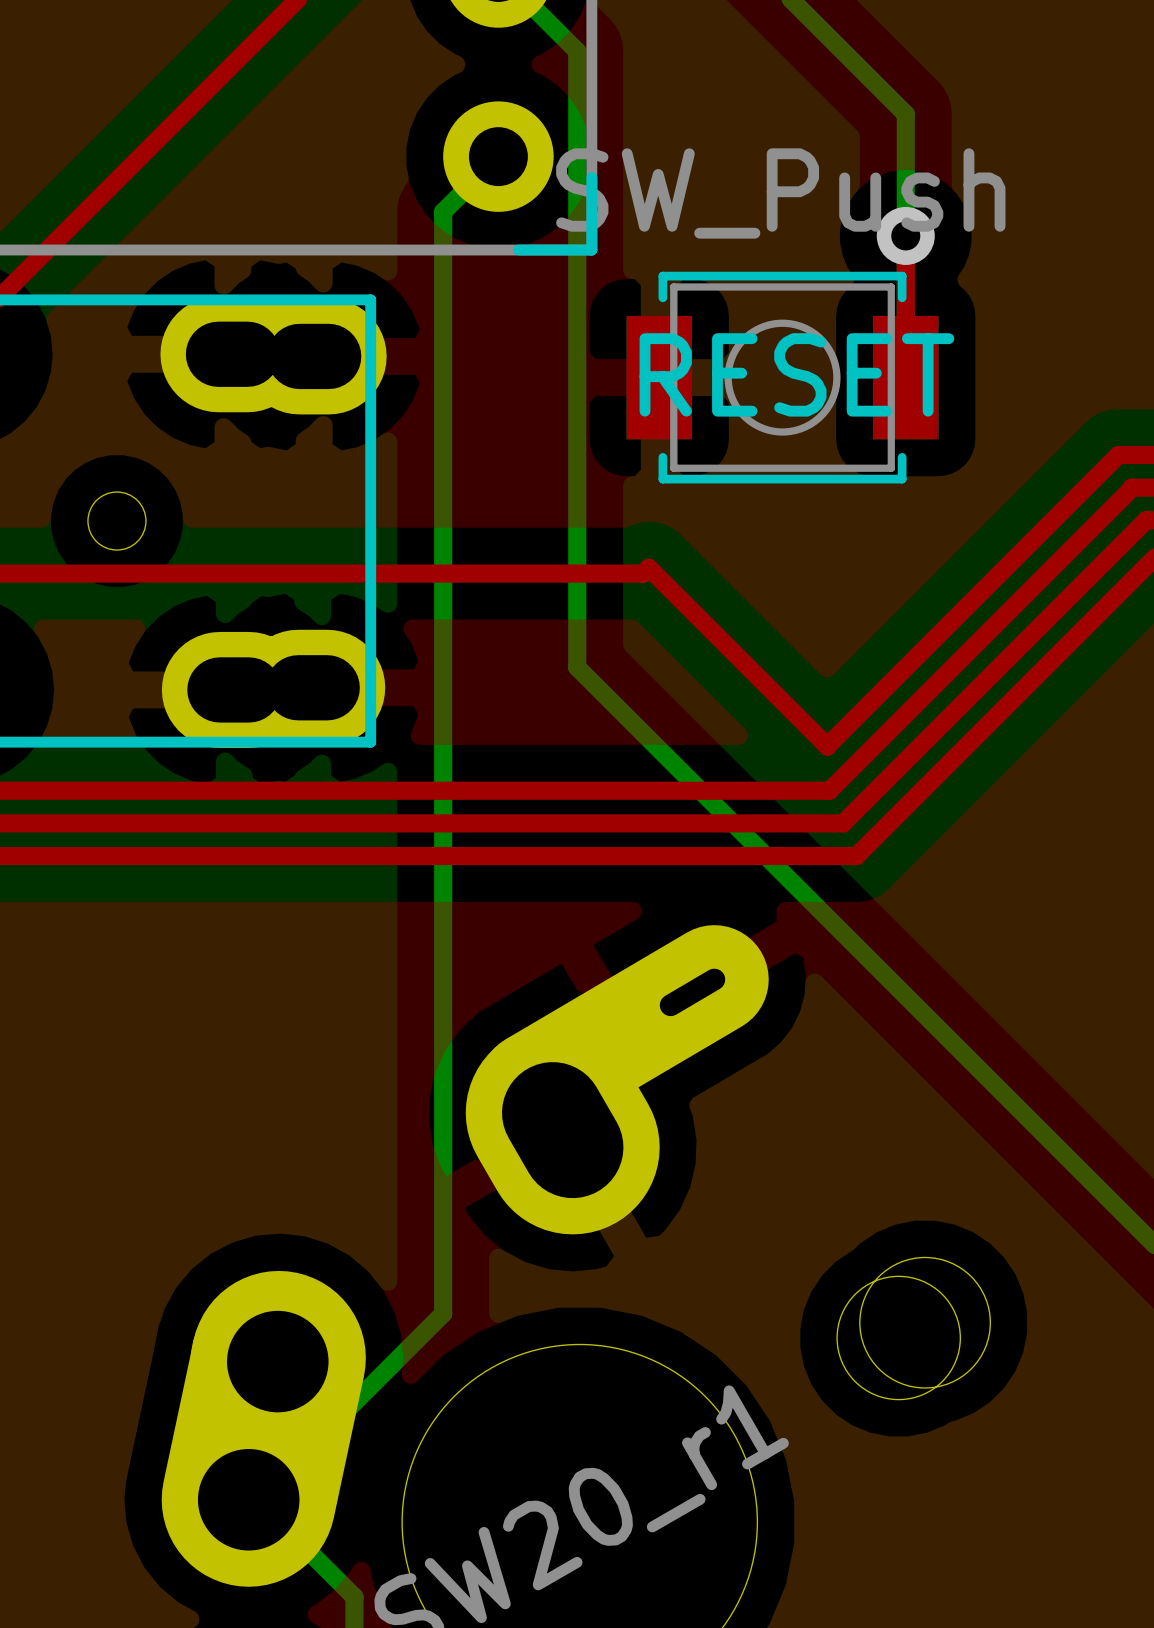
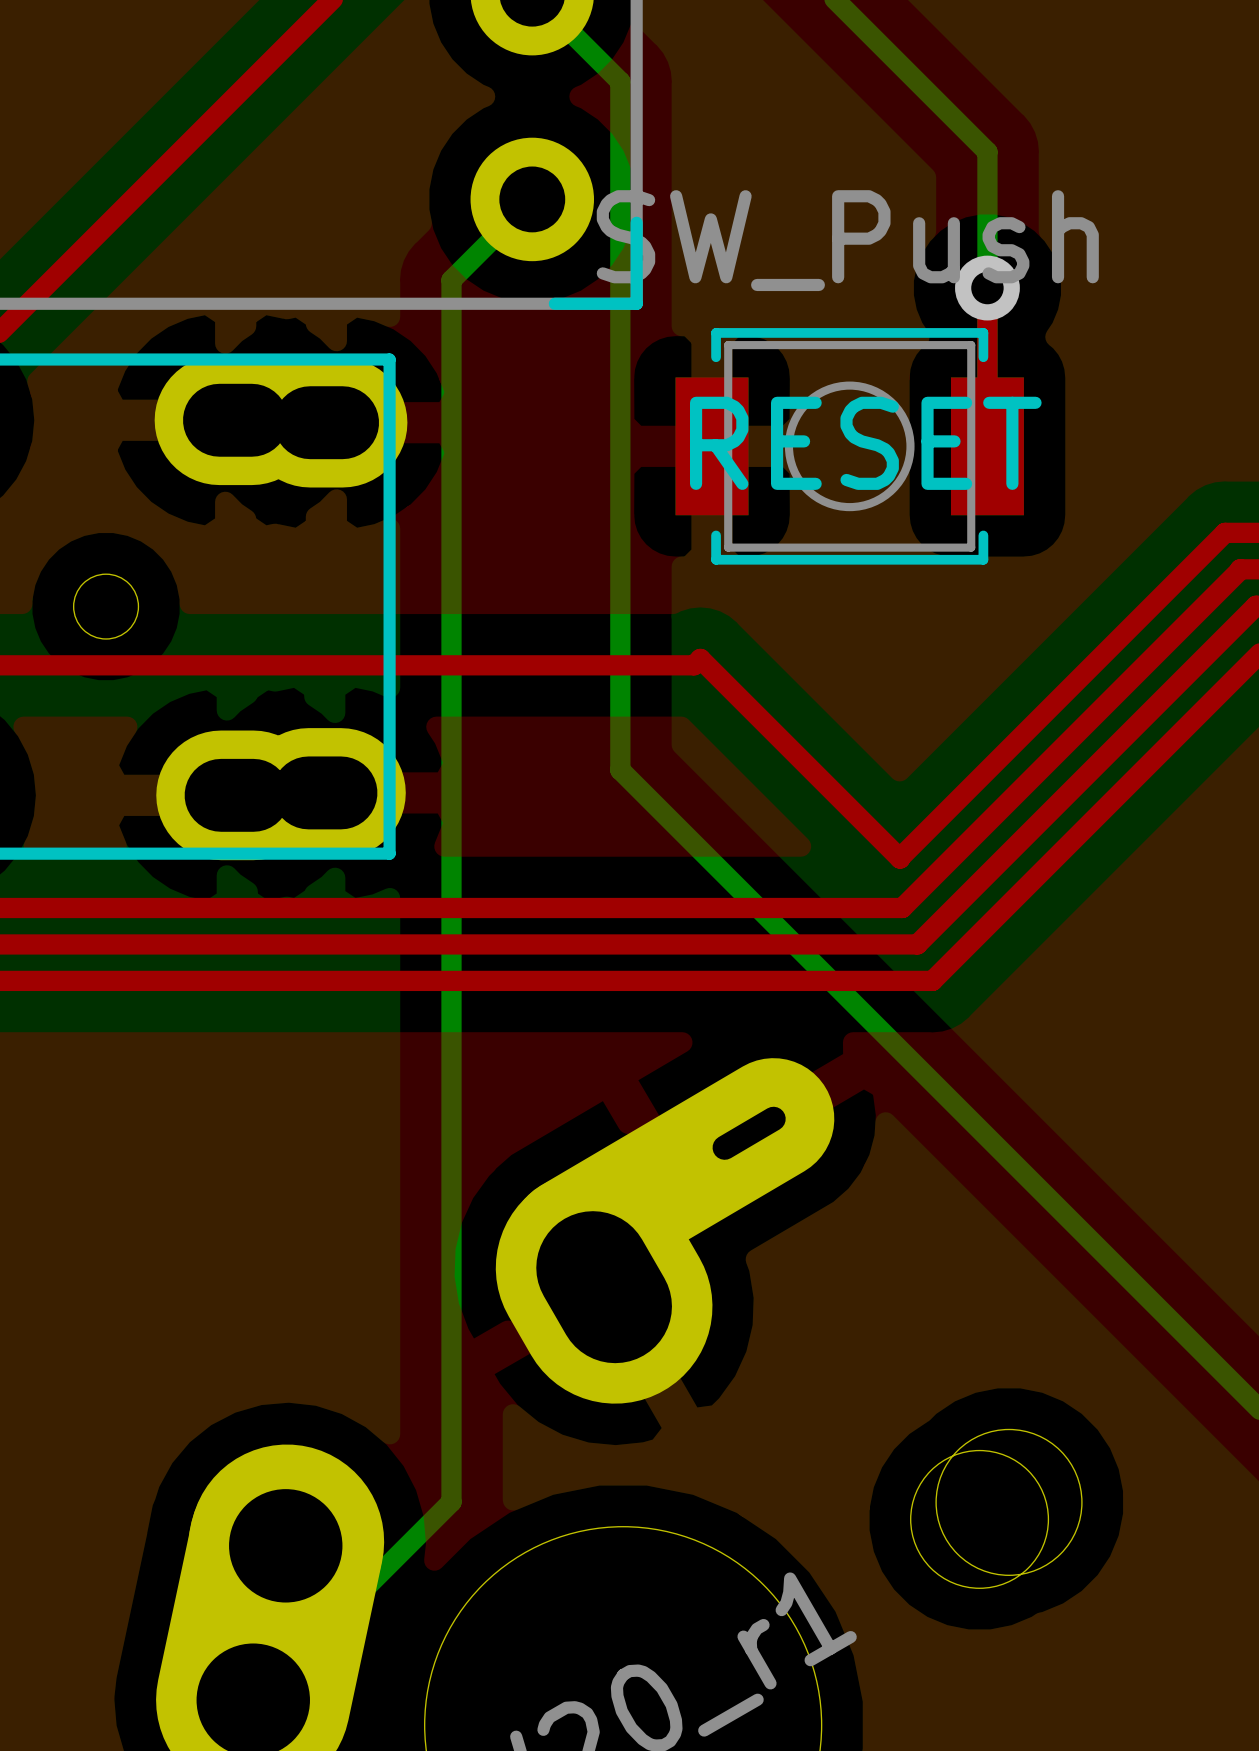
bottom track: (443, 211) (443, 1313) (257, 1499) -> (470, 261) (451, 280) (451, 1501) (253, 1700)

